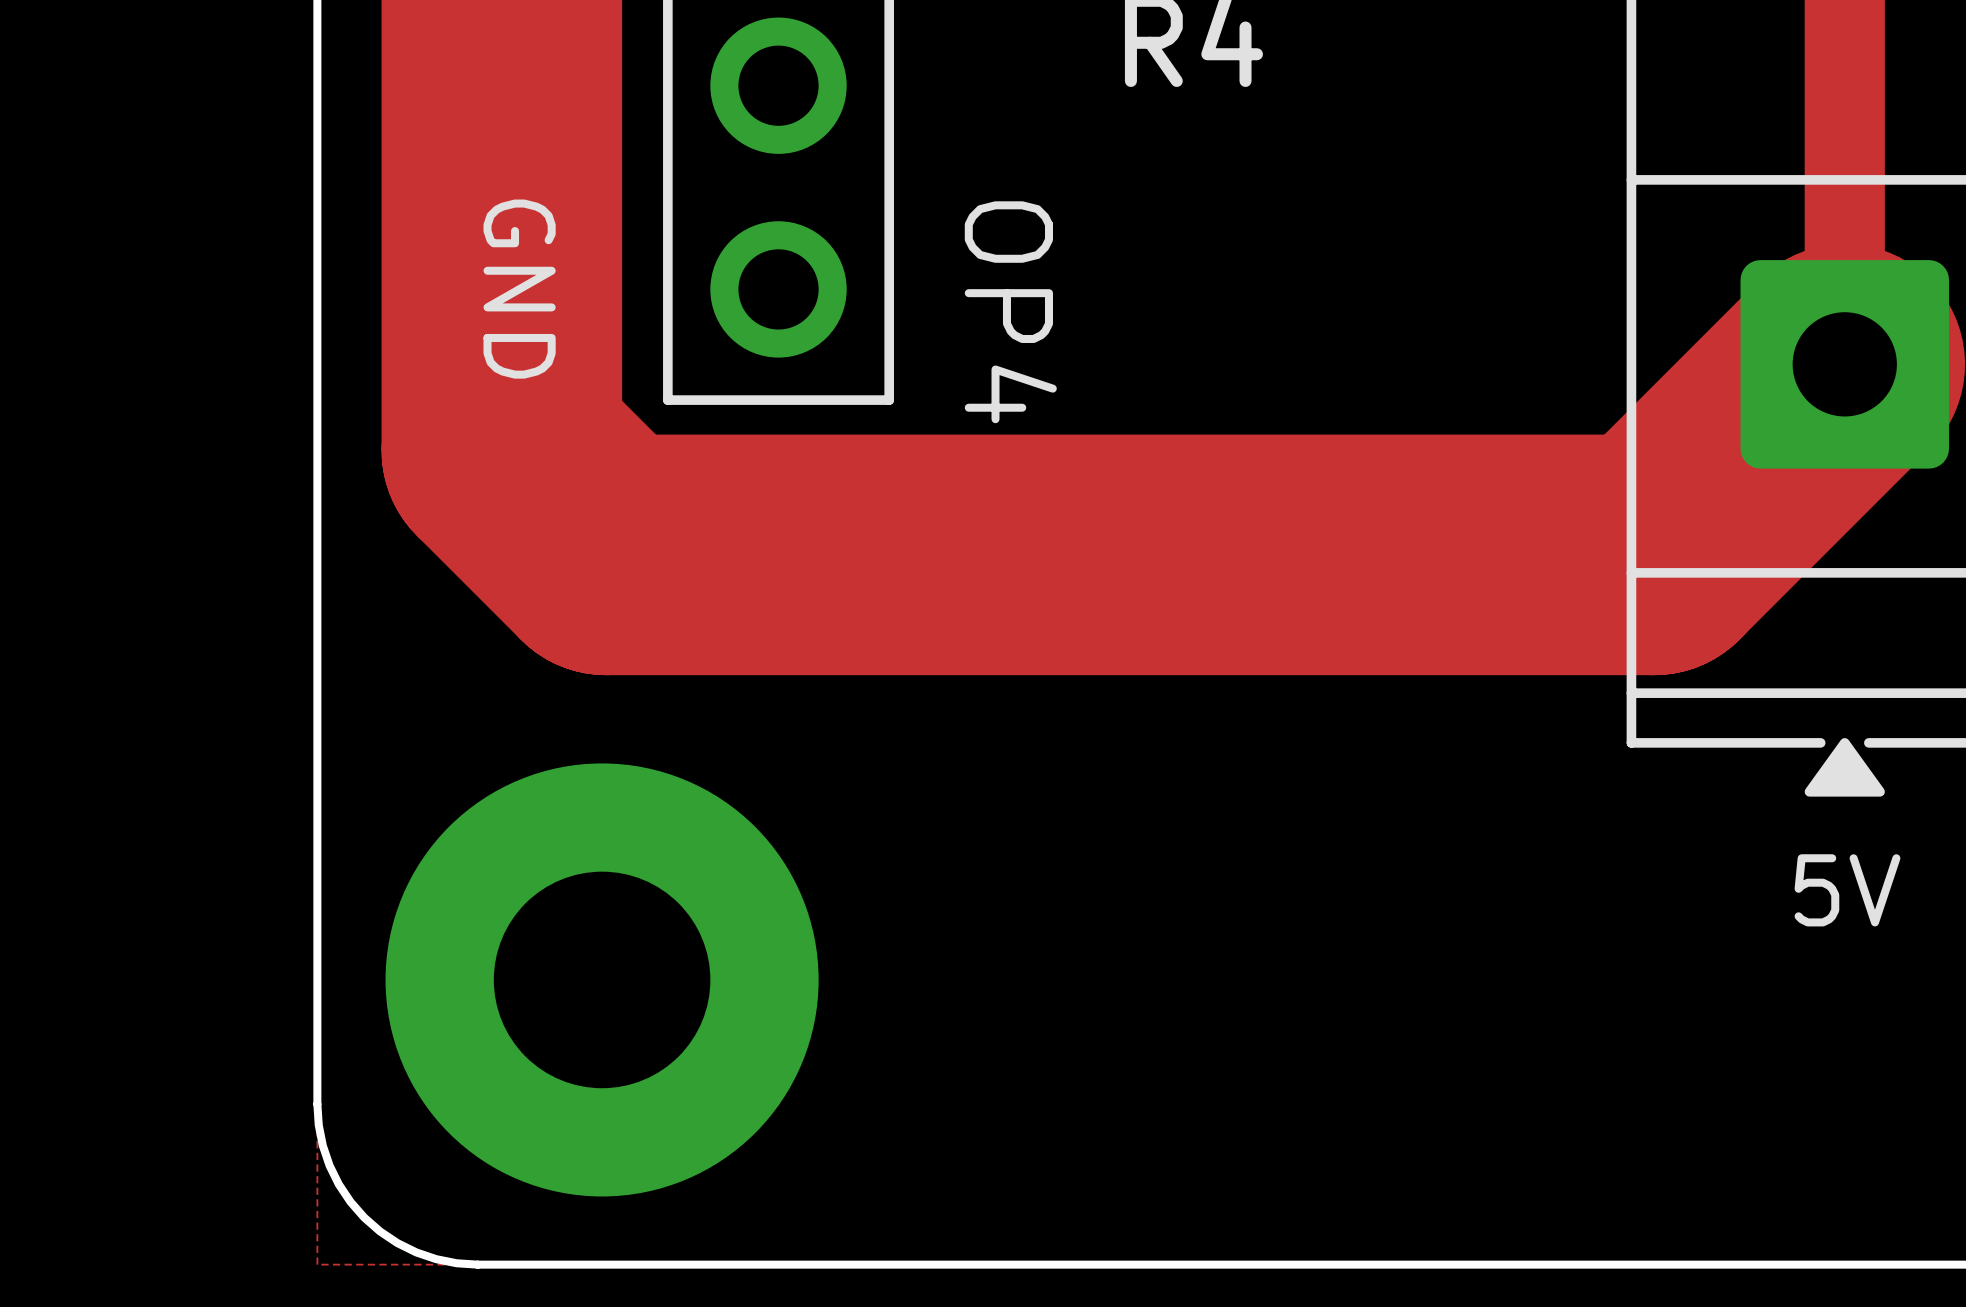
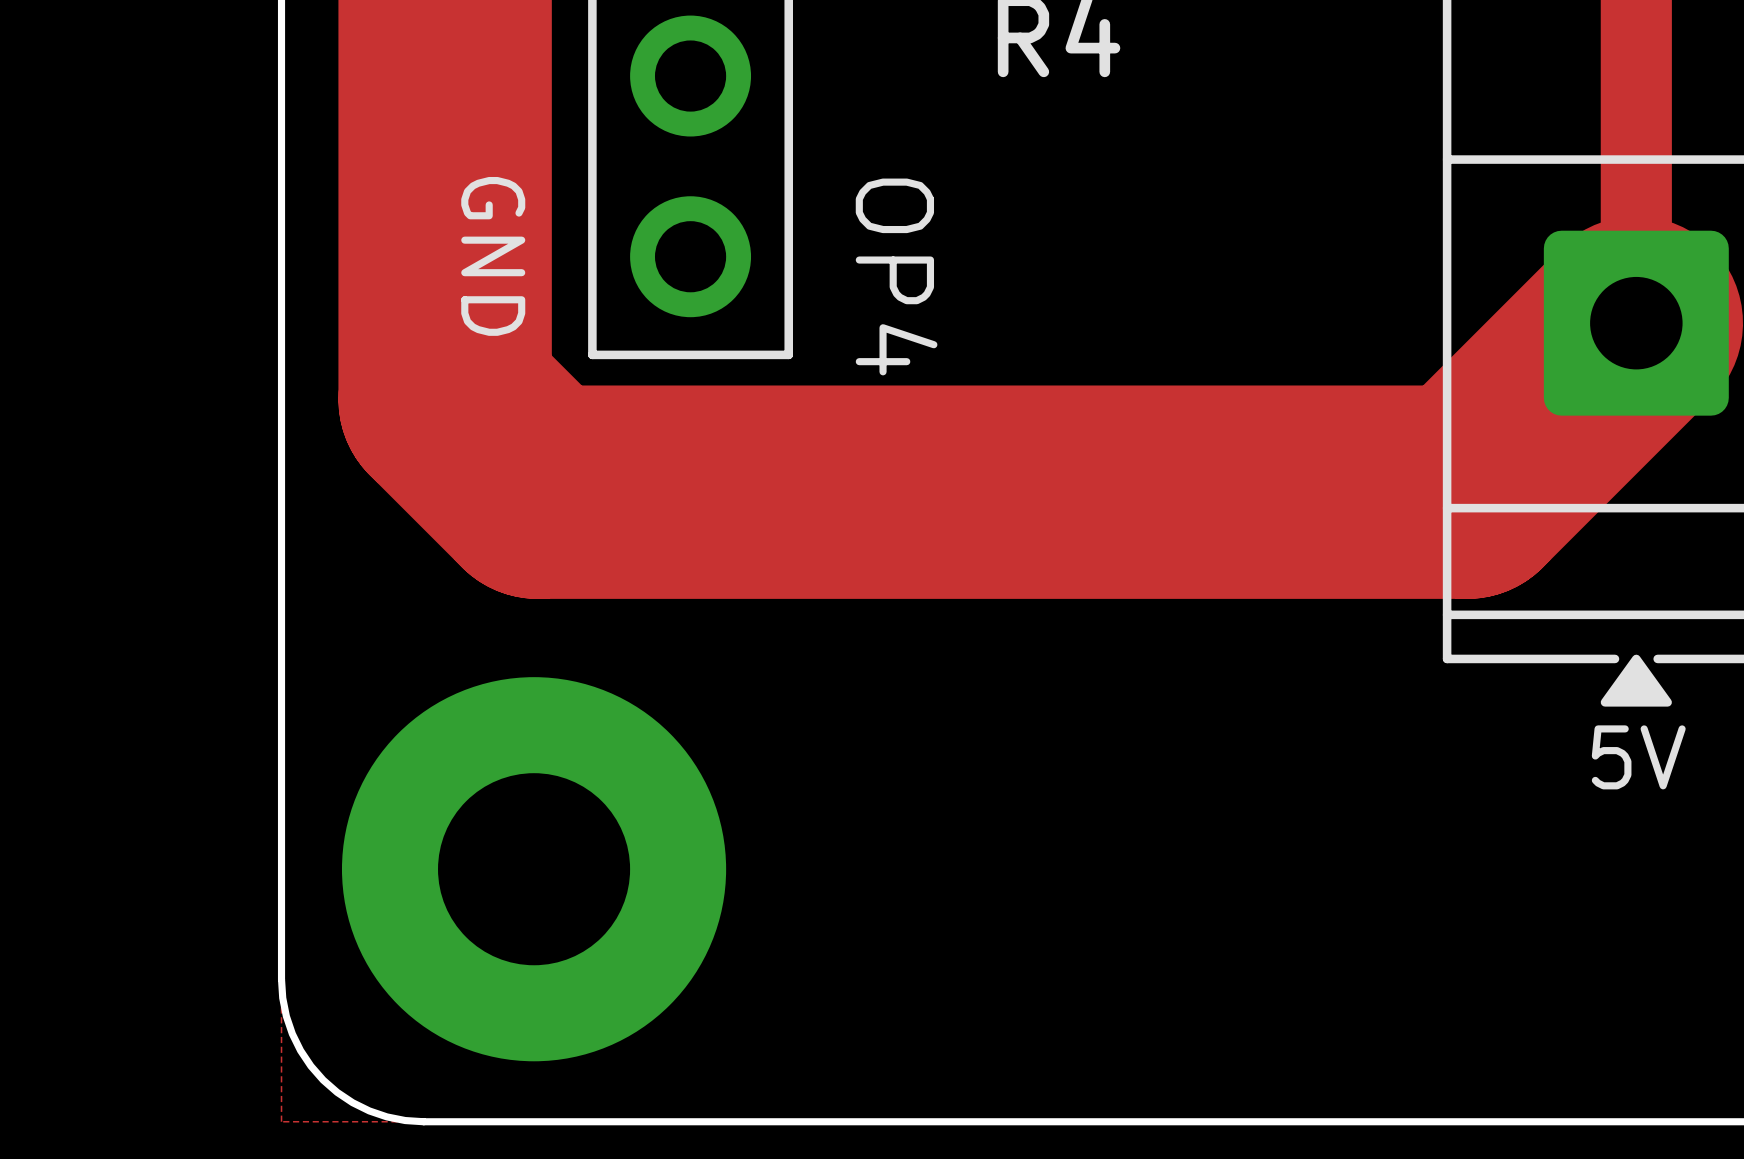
text position: GND (519, 289) -> GND (493, 256)
text position: 5V (1847, 890) -> 5V (1638, 757)

